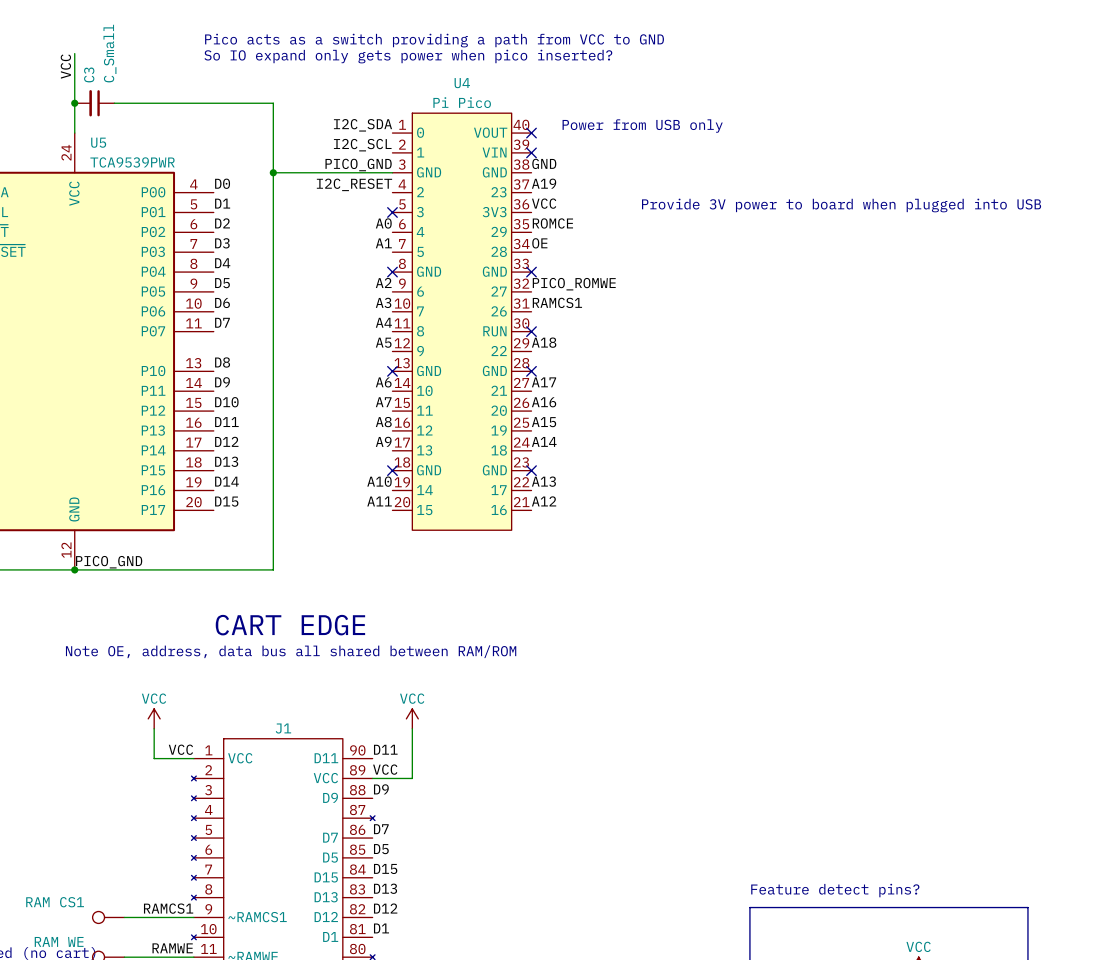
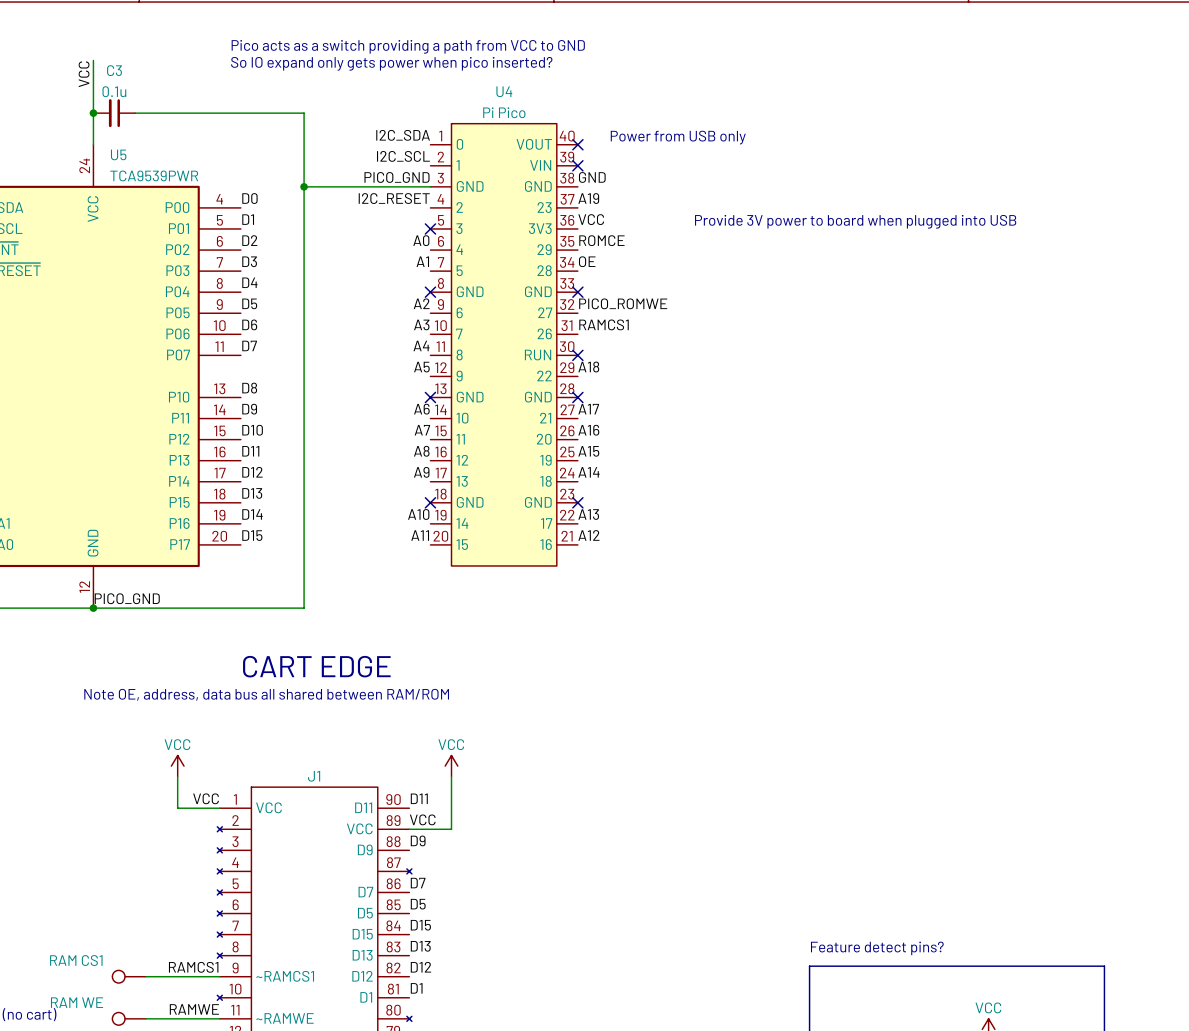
C3 value: C_Small (109, 53) -> 0.1u (114, 91)
C3 name rotation: 0° (89, 74) -> 90° clockwise (114, 70)

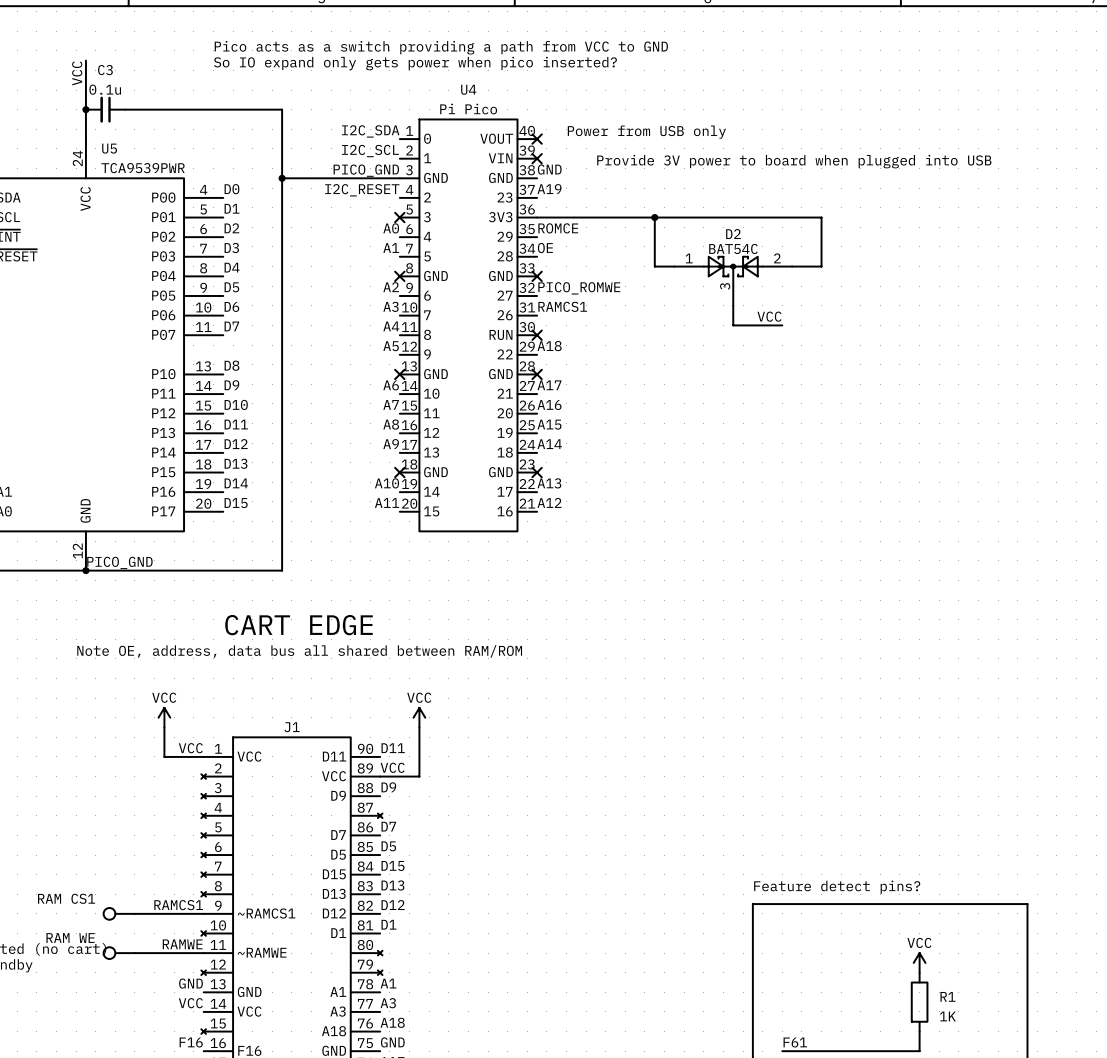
label: VCC (591, 219) -> none
text position: Provide 3V power to board when plugged into USB (855, 221) -> Provide 3V power to board when plugged into USB (794, 161)
wire: none -> (537, 217) (821, 217) (821, 266) (792, 266)
wire: none -> (654, 217) (654, 266) (674, 266)
junction: none -> (654, 217)
D2: none -> BAT54C (733, 281)
wire: none -> (733, 305) (733, 325) (782, 325)
label: none -> VCC (769, 316)

